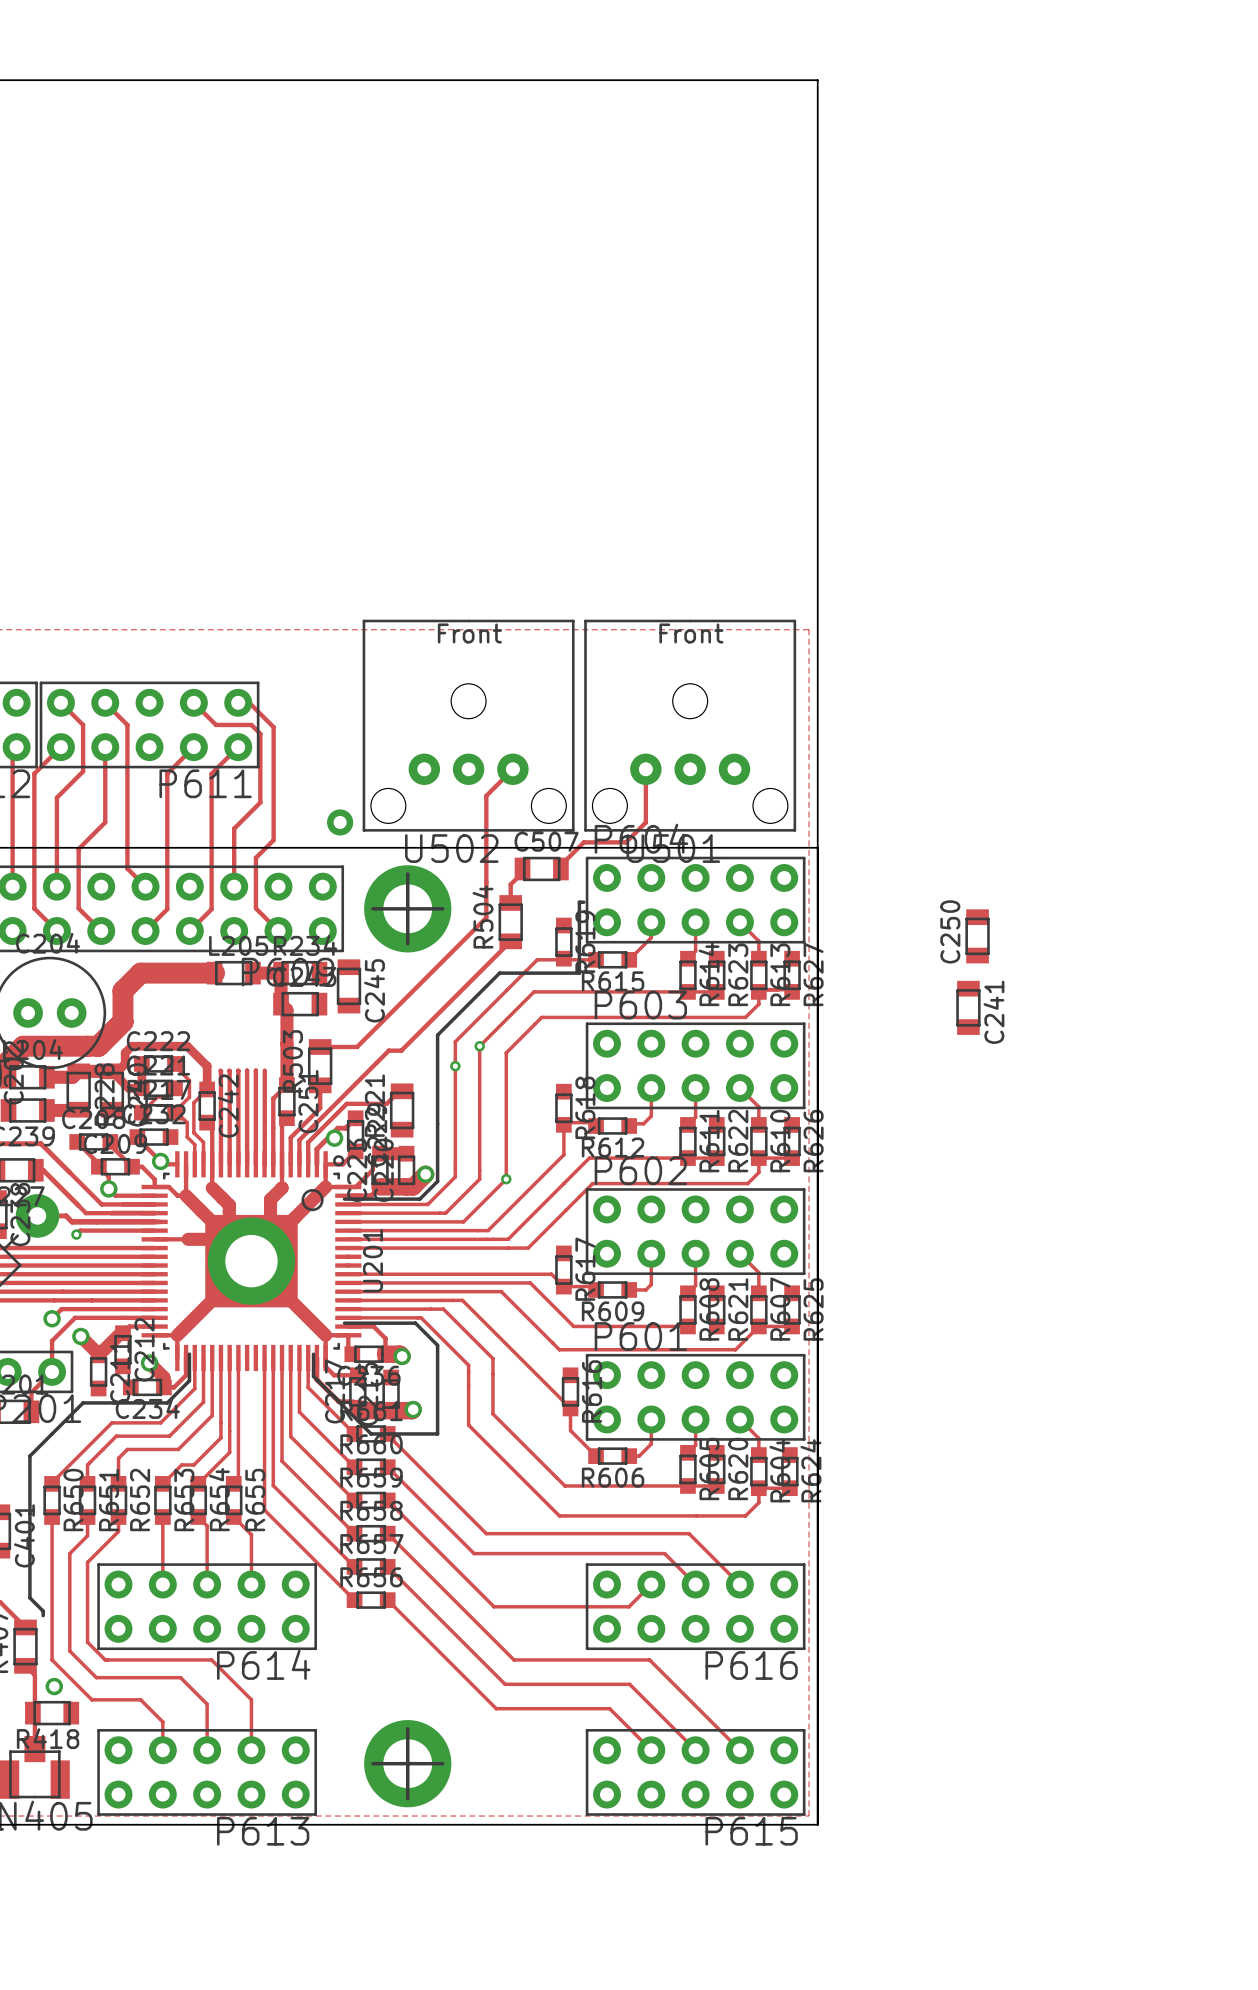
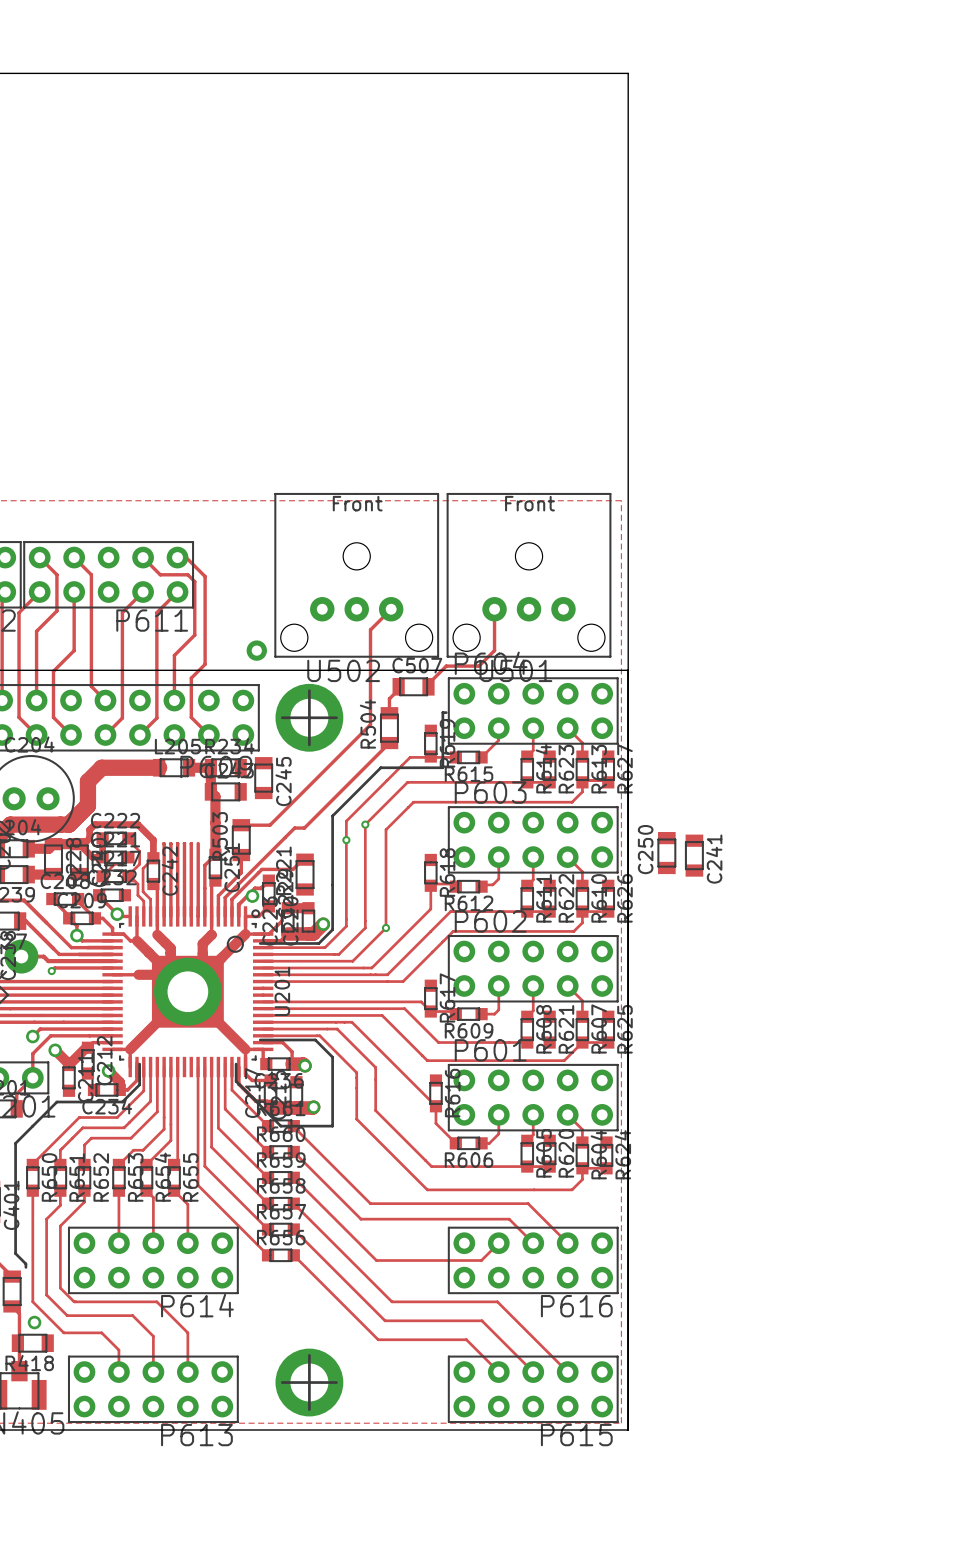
C250 position: (977, 936) -> (666, 853)
C241 position: (968, 1007) -> (694, 855)

